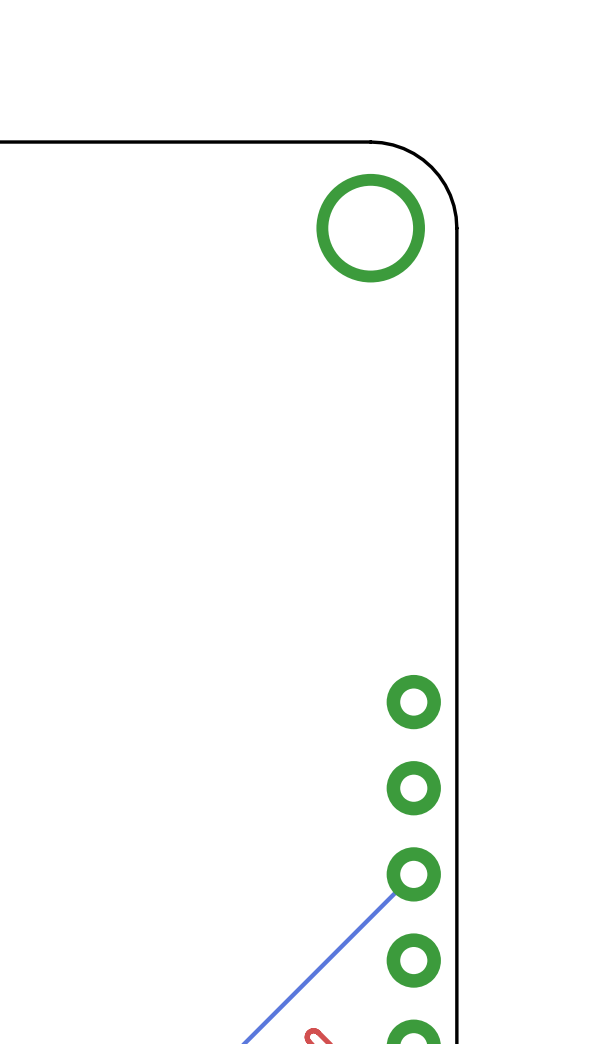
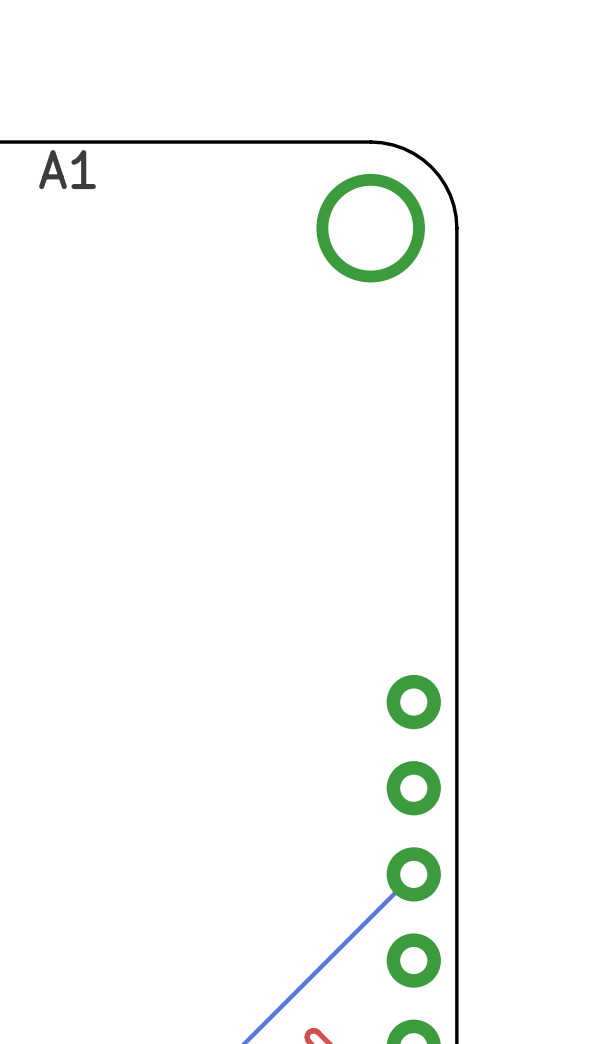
A1 name: none -> A1 (67, 169)

